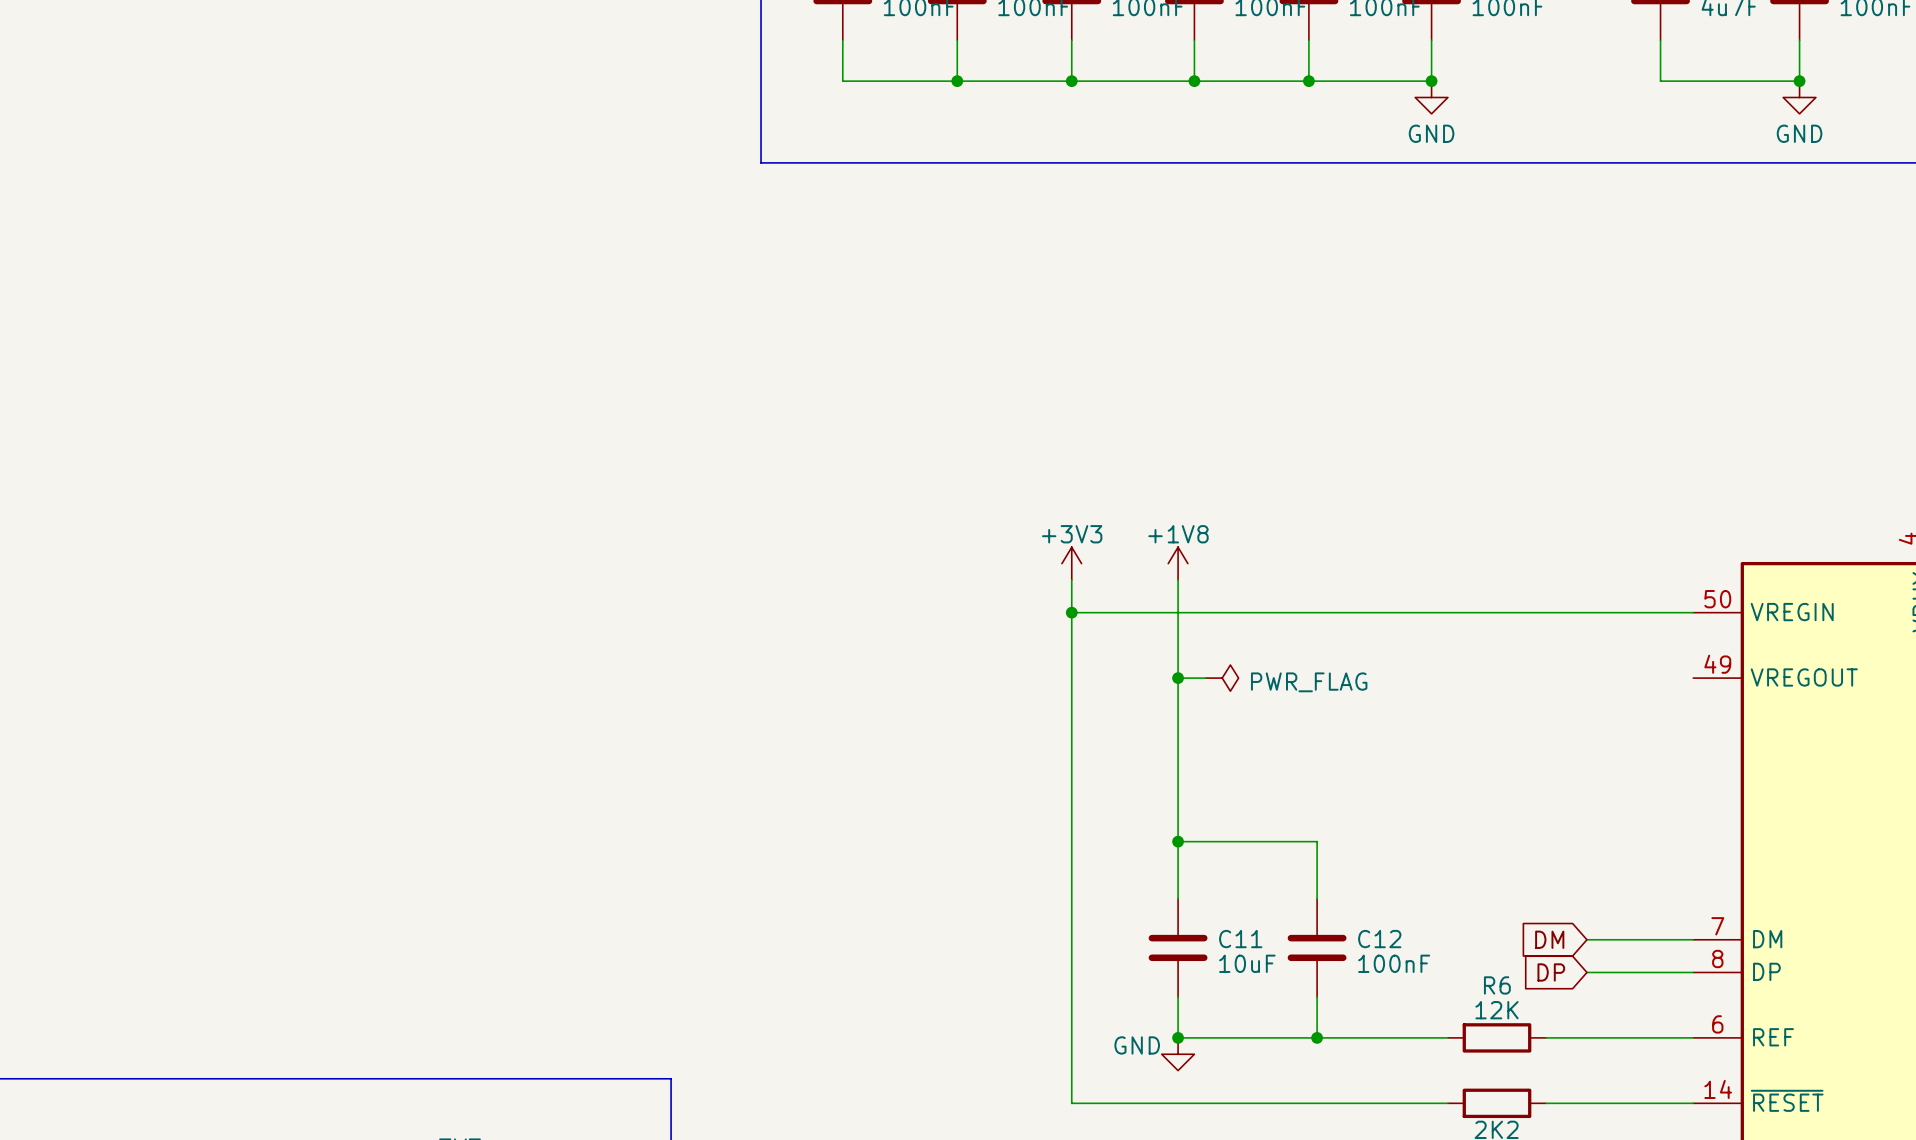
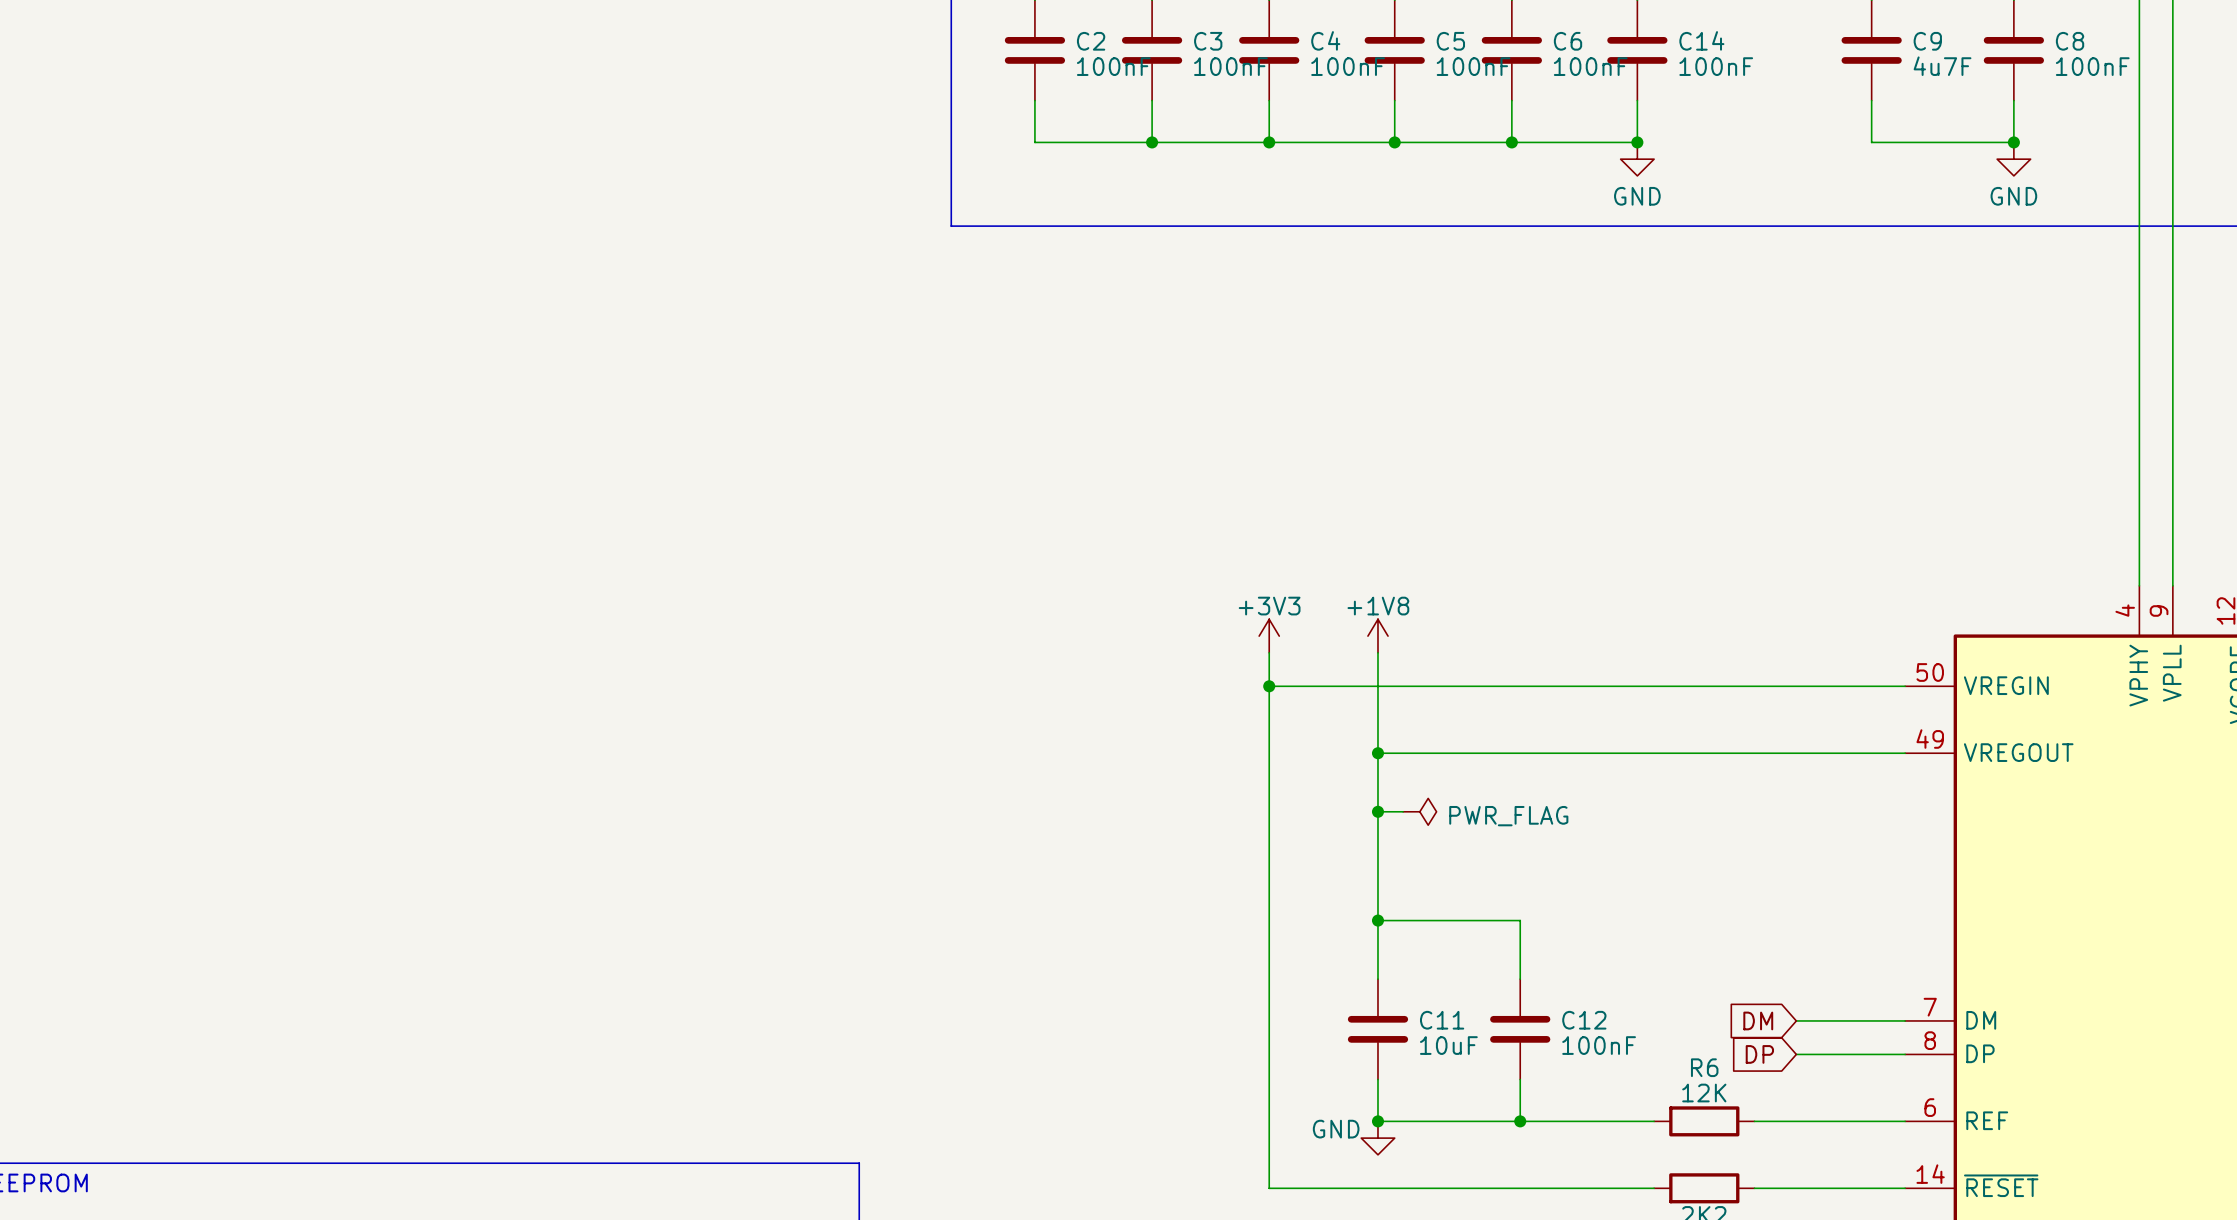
wire: none -> (1406, 753) (1905, 753)
power symbol position: PWR_FLAG (1222, 678) -> PWR_FLAG (1419, 811)
wire: none -> (1377, 811) (1403, 811)
junction: none -> (1377, 811)

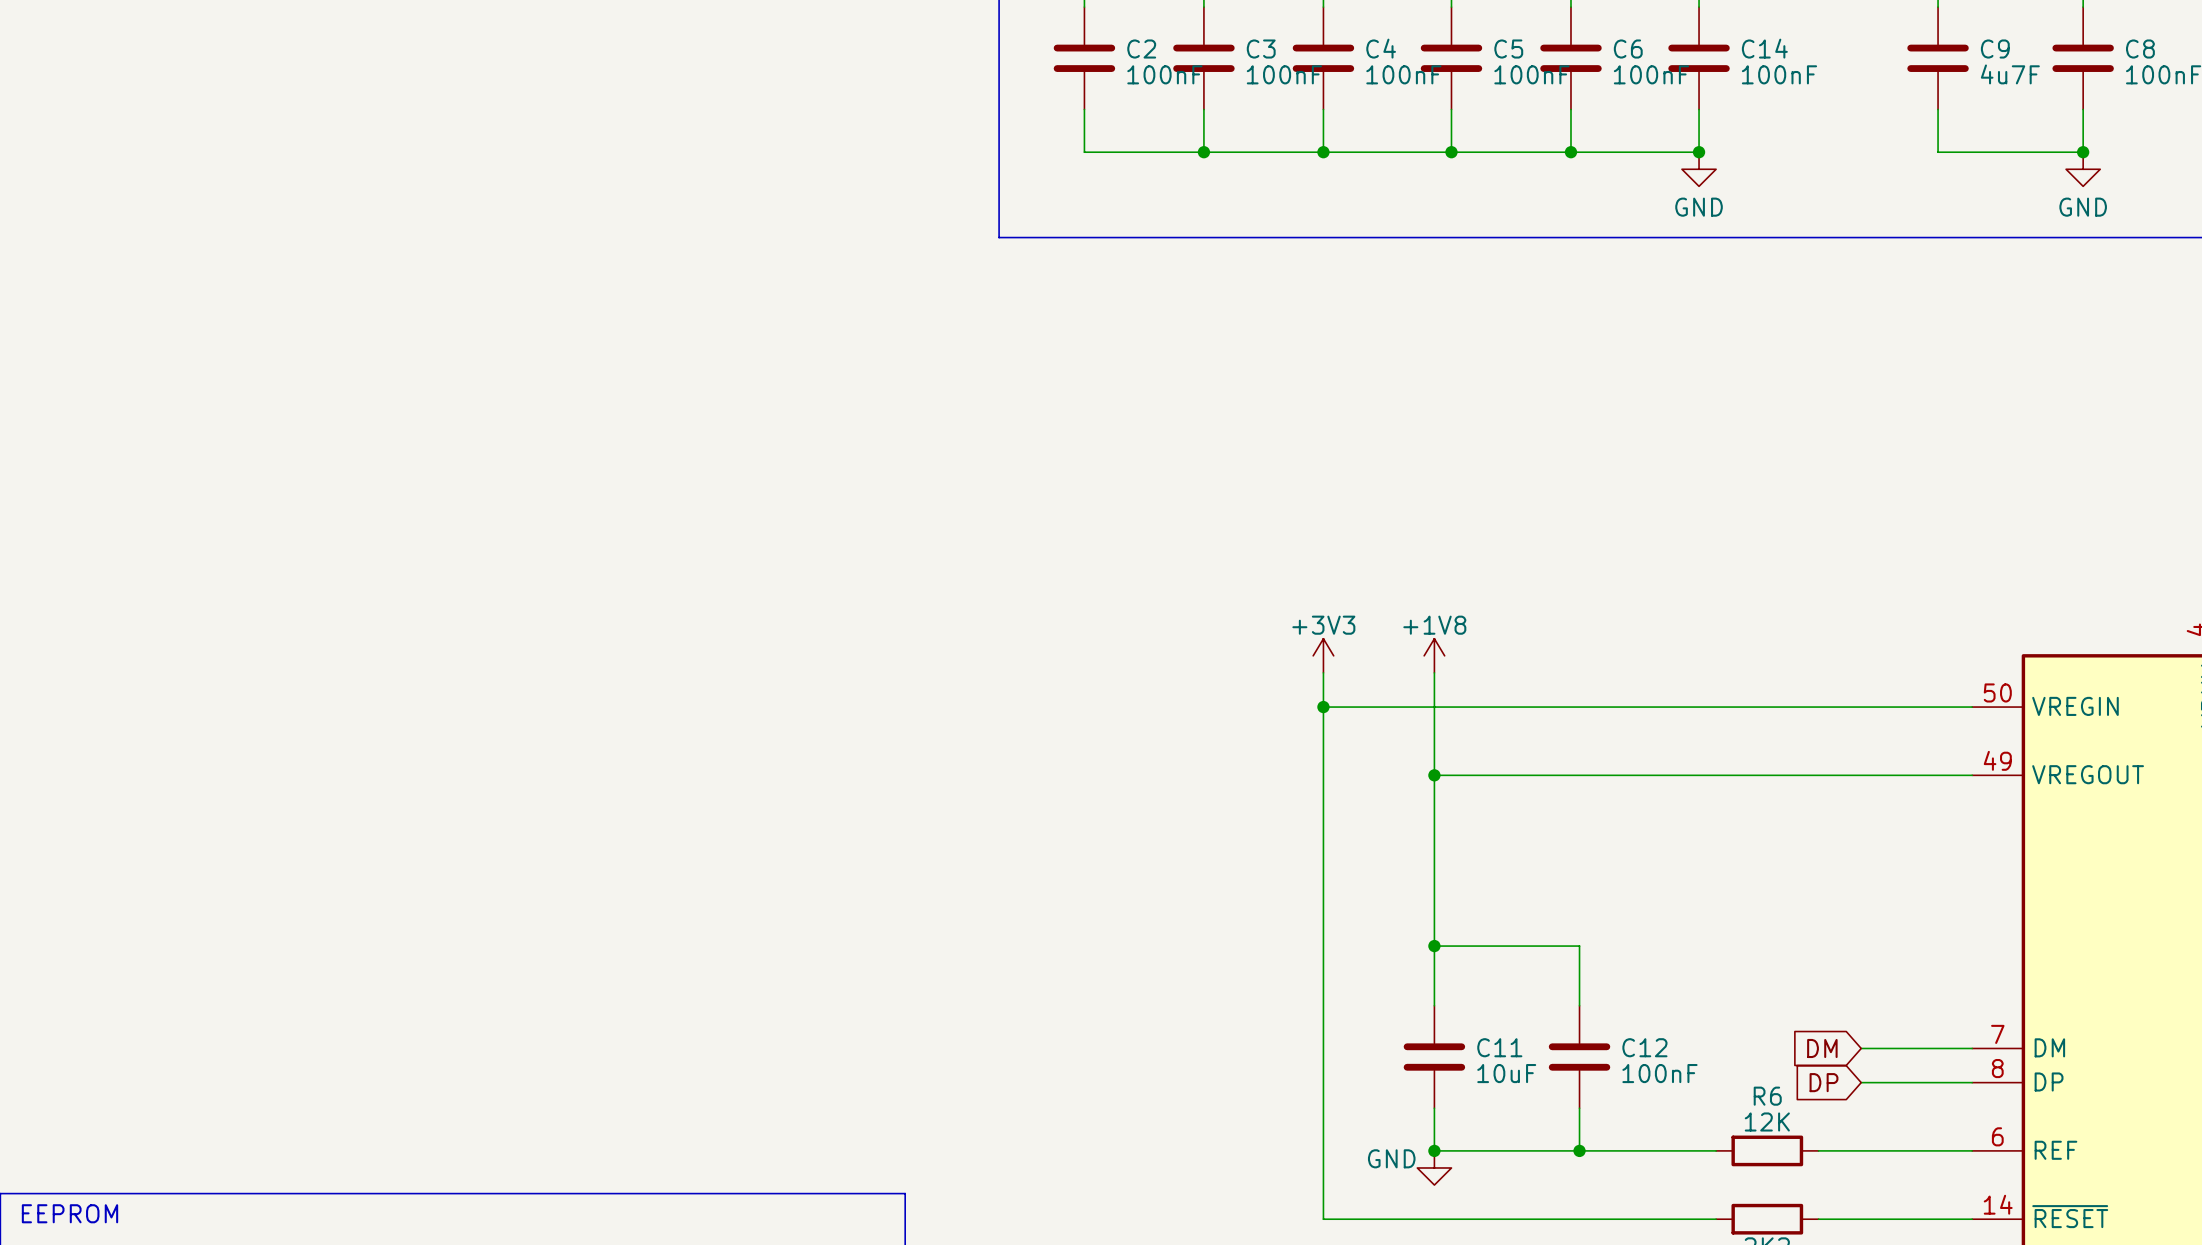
wire: (1377, 811) (1403, 811) -> none
junction: (1377, 811) -> none
power symbol: PWR_FLAG (1419, 811) -> none

